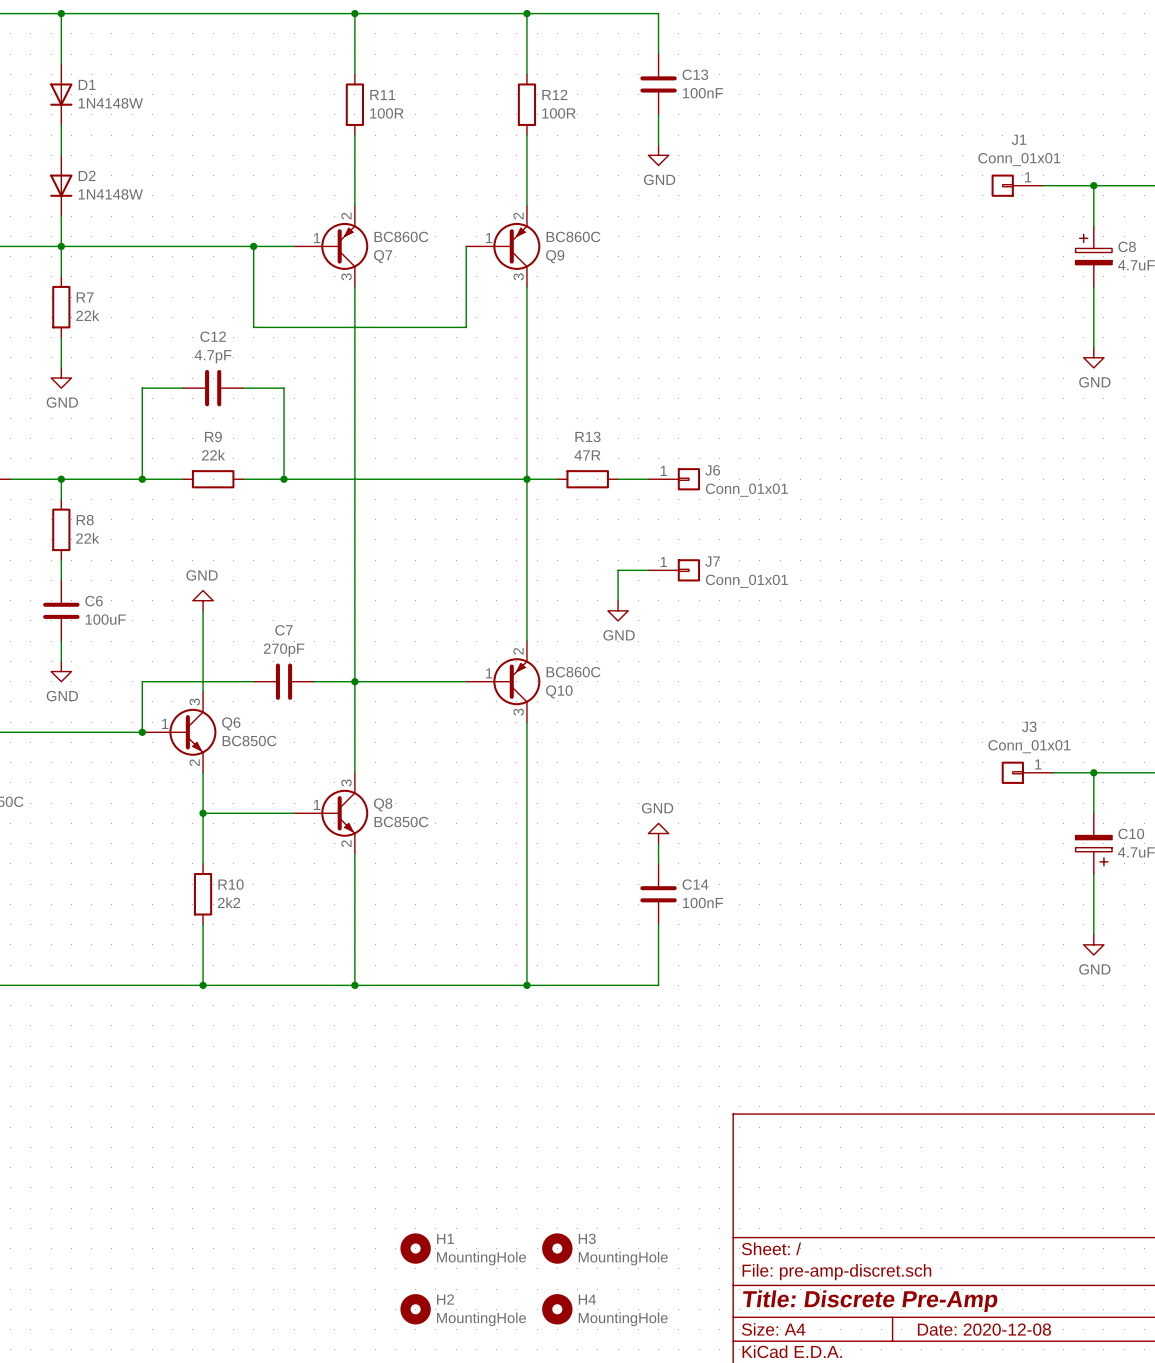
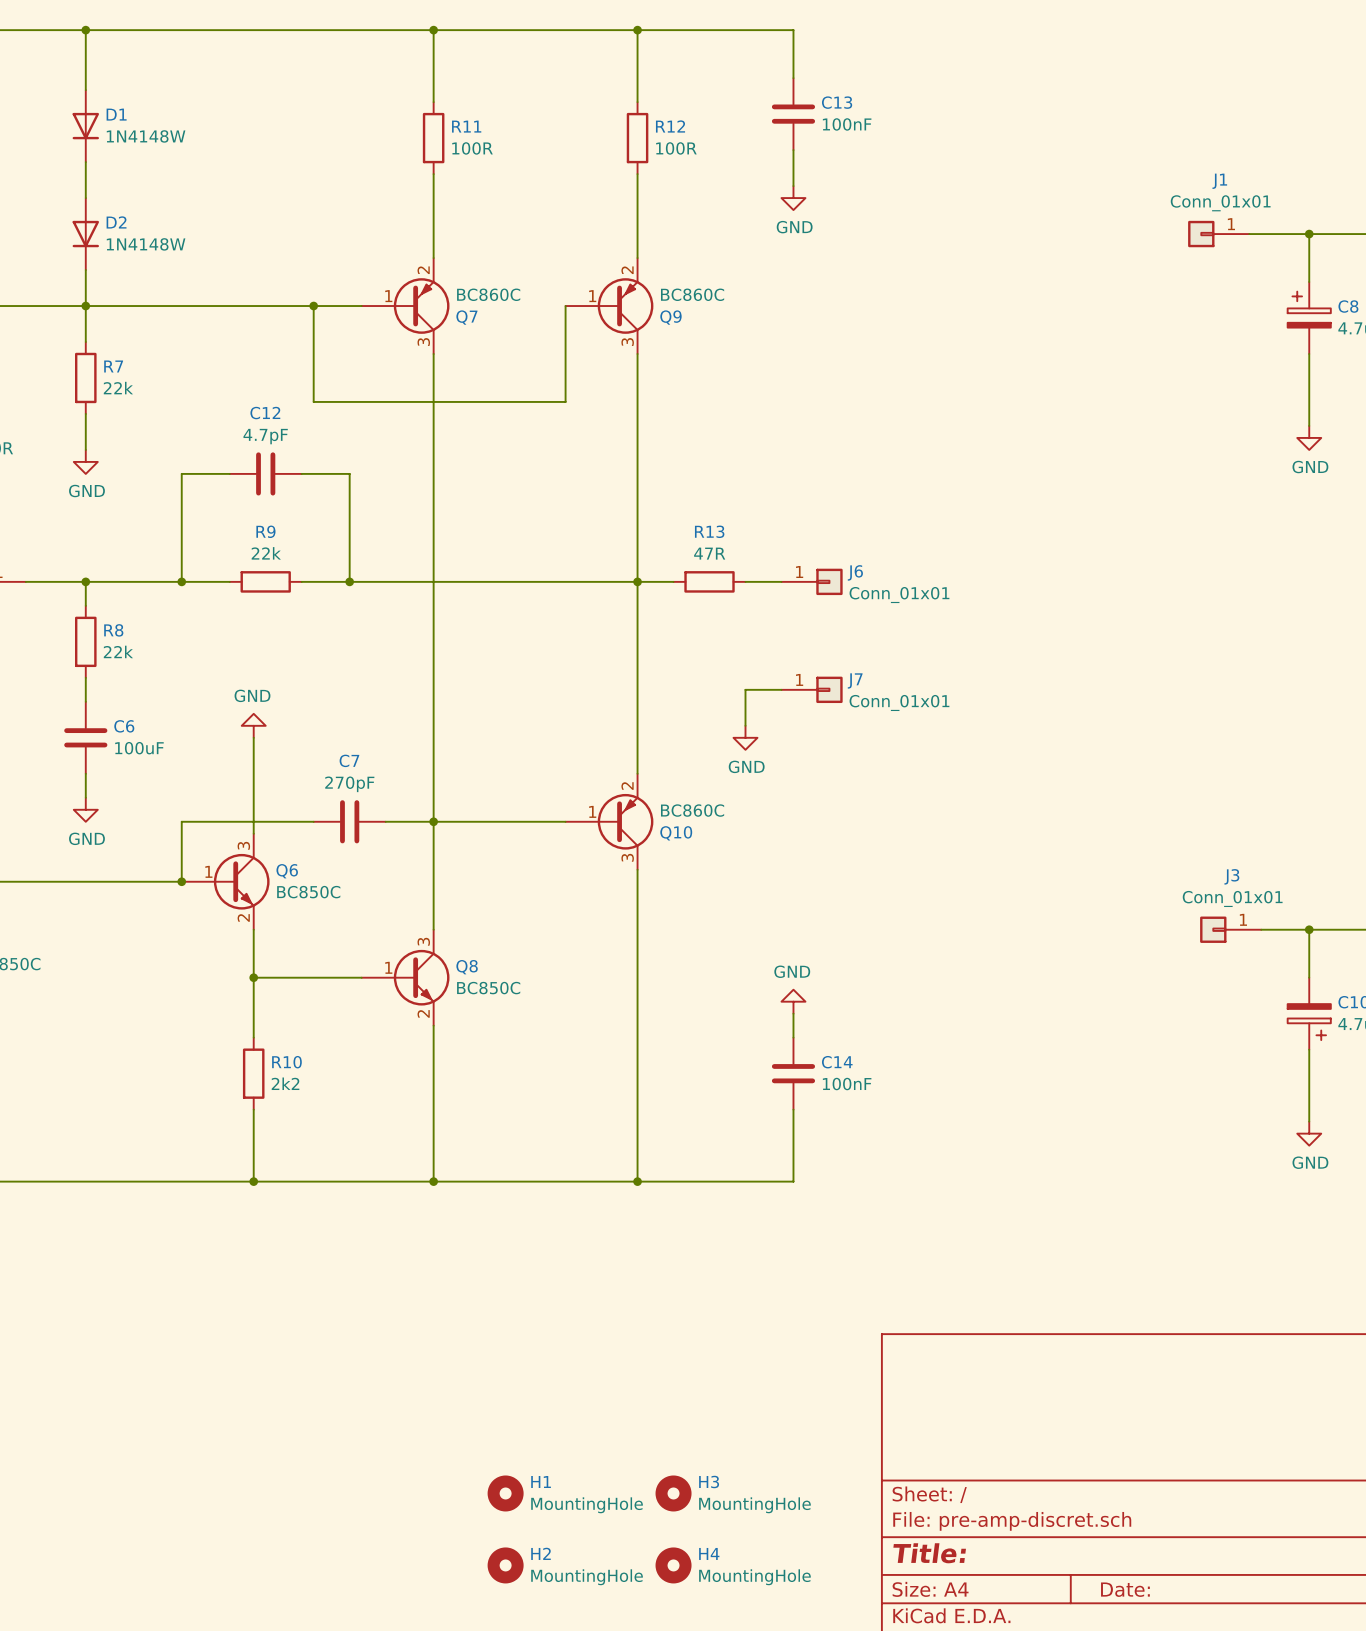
title block: Title: Discrete Pre-Amp (870, 1301) -> Title: (929, 1553)
title block: Date: 2020-12-08 (984, 1329) -> Date: (1125, 1589)

